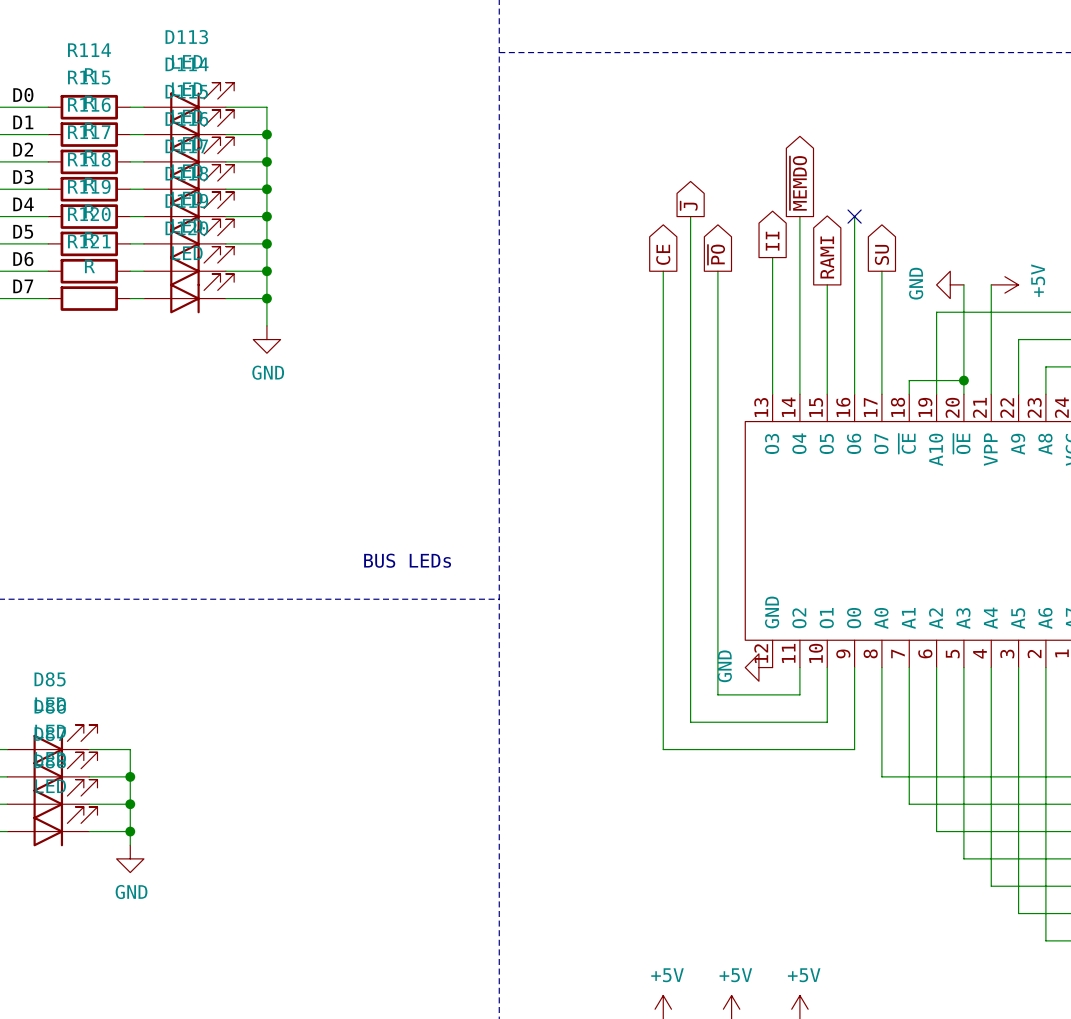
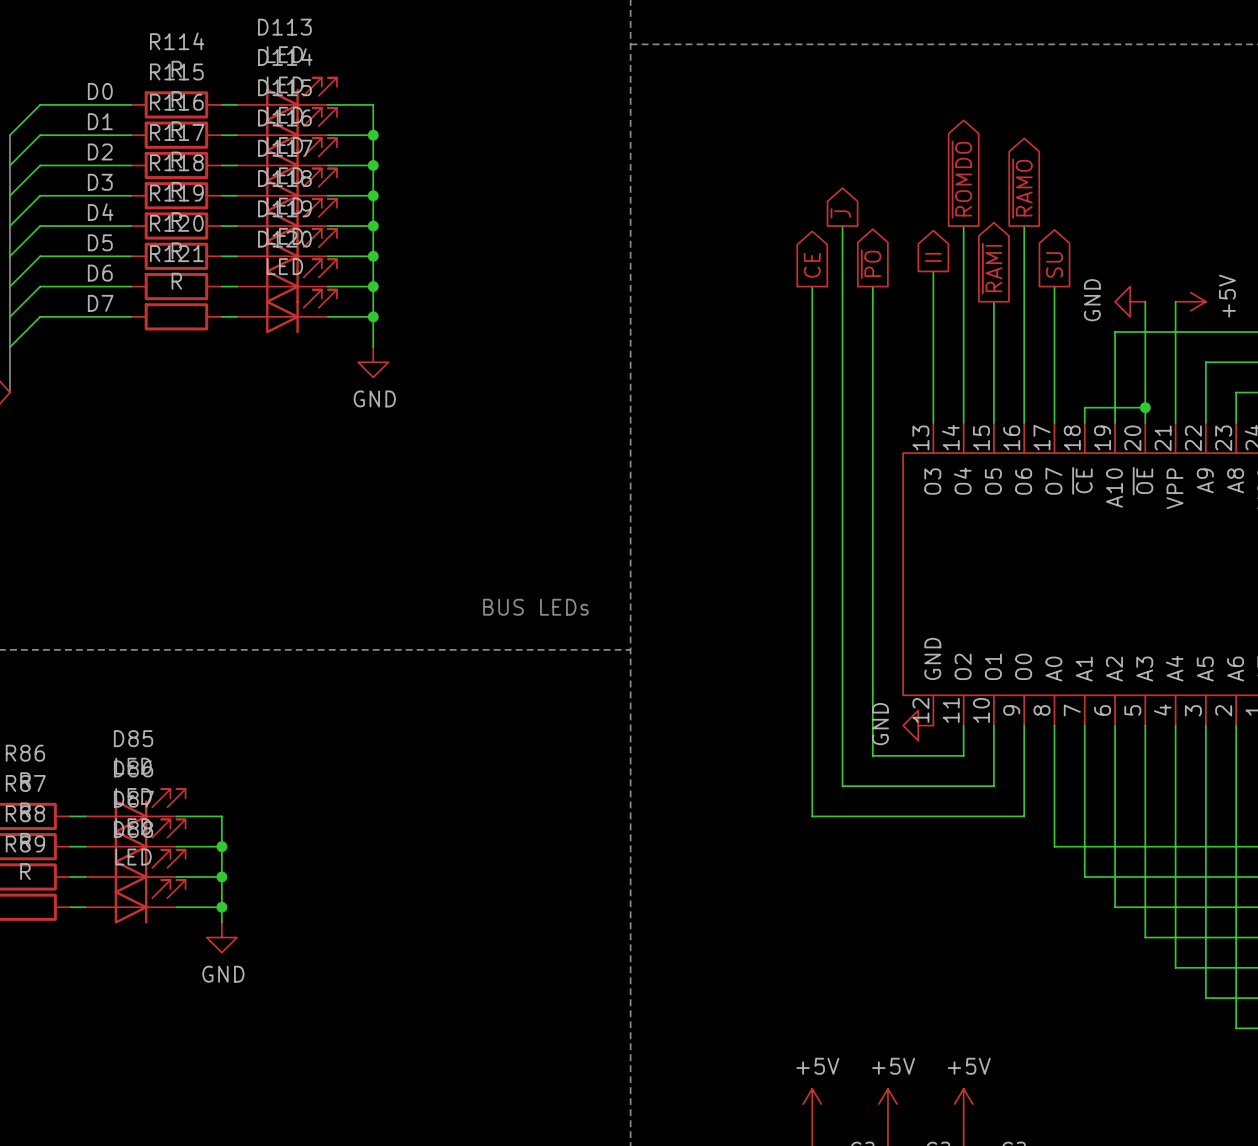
global label: ~{MEMDO} (798, 183) -> ~{ROMDO} (961, 179)
global label: none -> ~{RAMO} (1022, 188)
no-connect mark: (854, 216) -> none
global label: RAMI (827, 257) -> ~{RAMI} (992, 268)

